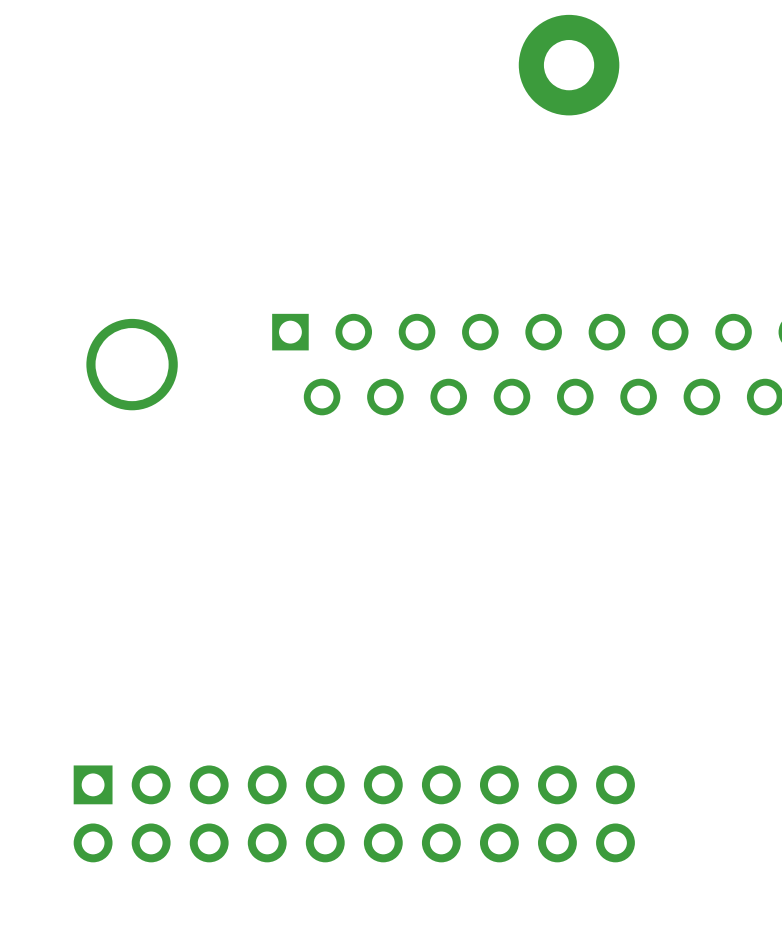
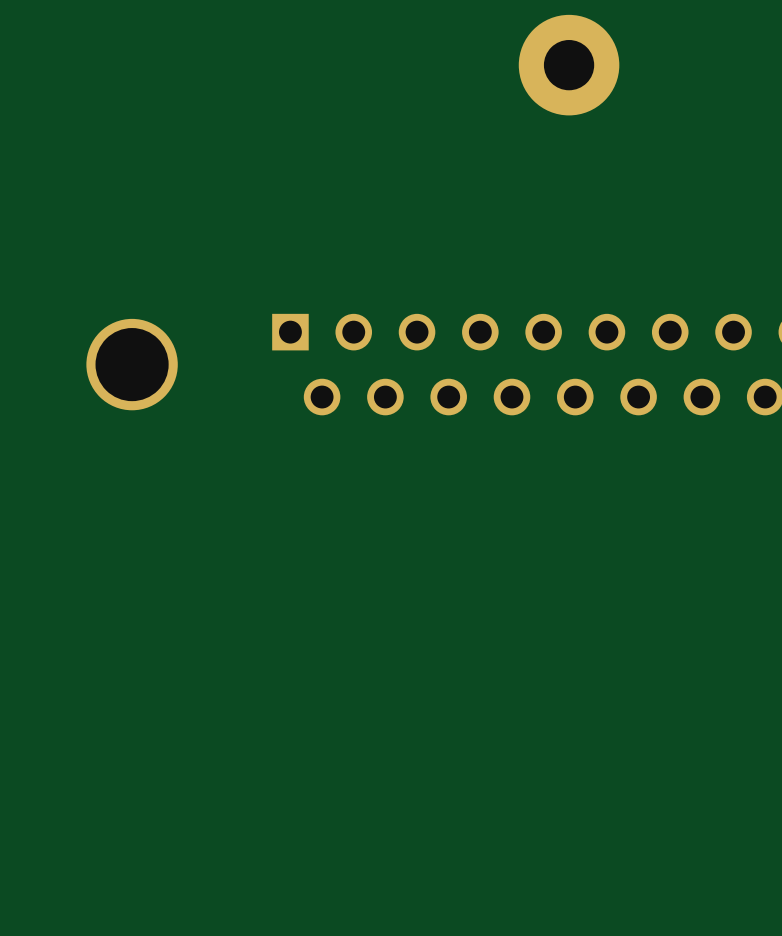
part: (354, 813) -> none

